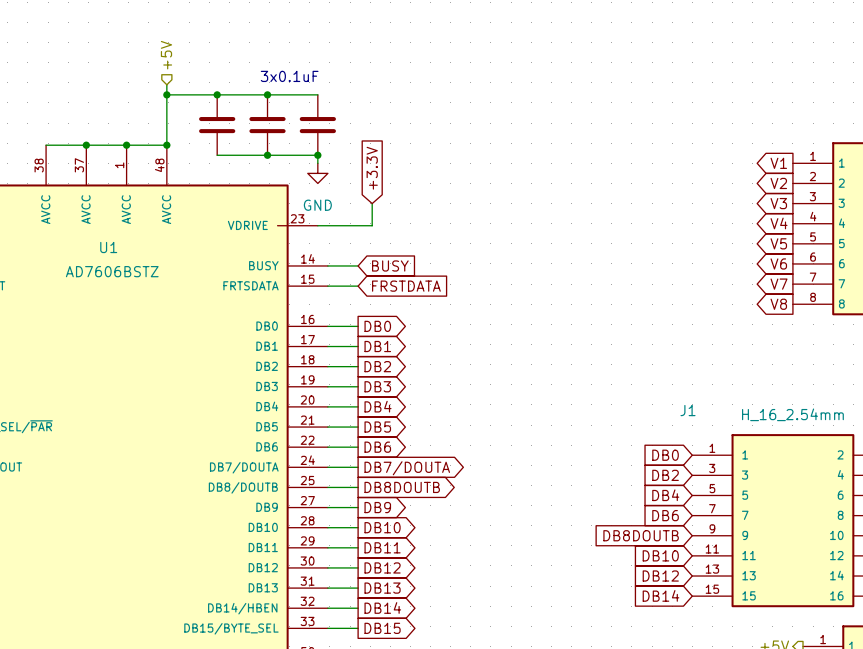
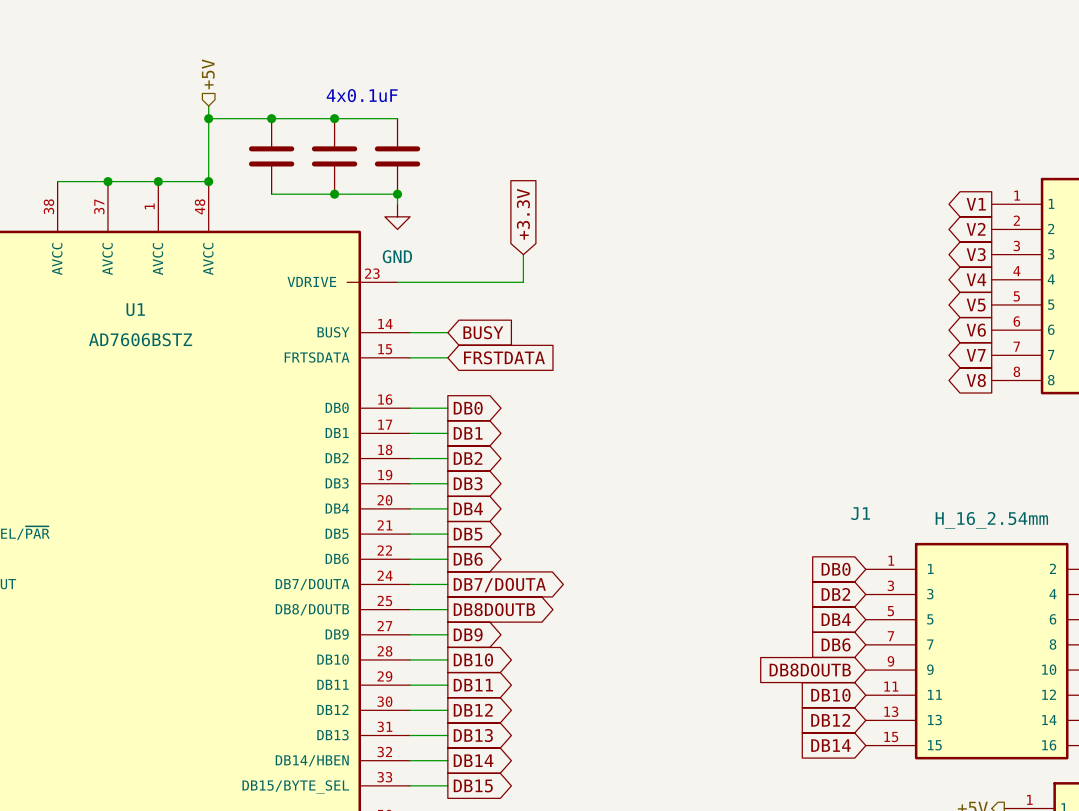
text: 3x0.1uF (289, 76) -> 4x0.1uF (362, 95)
global label position: +3.3V (372, 168) -> +3.3V (523, 214)
wire: (372, 203) (372, 225) -> (523, 254) (523, 282) (465, 282)

